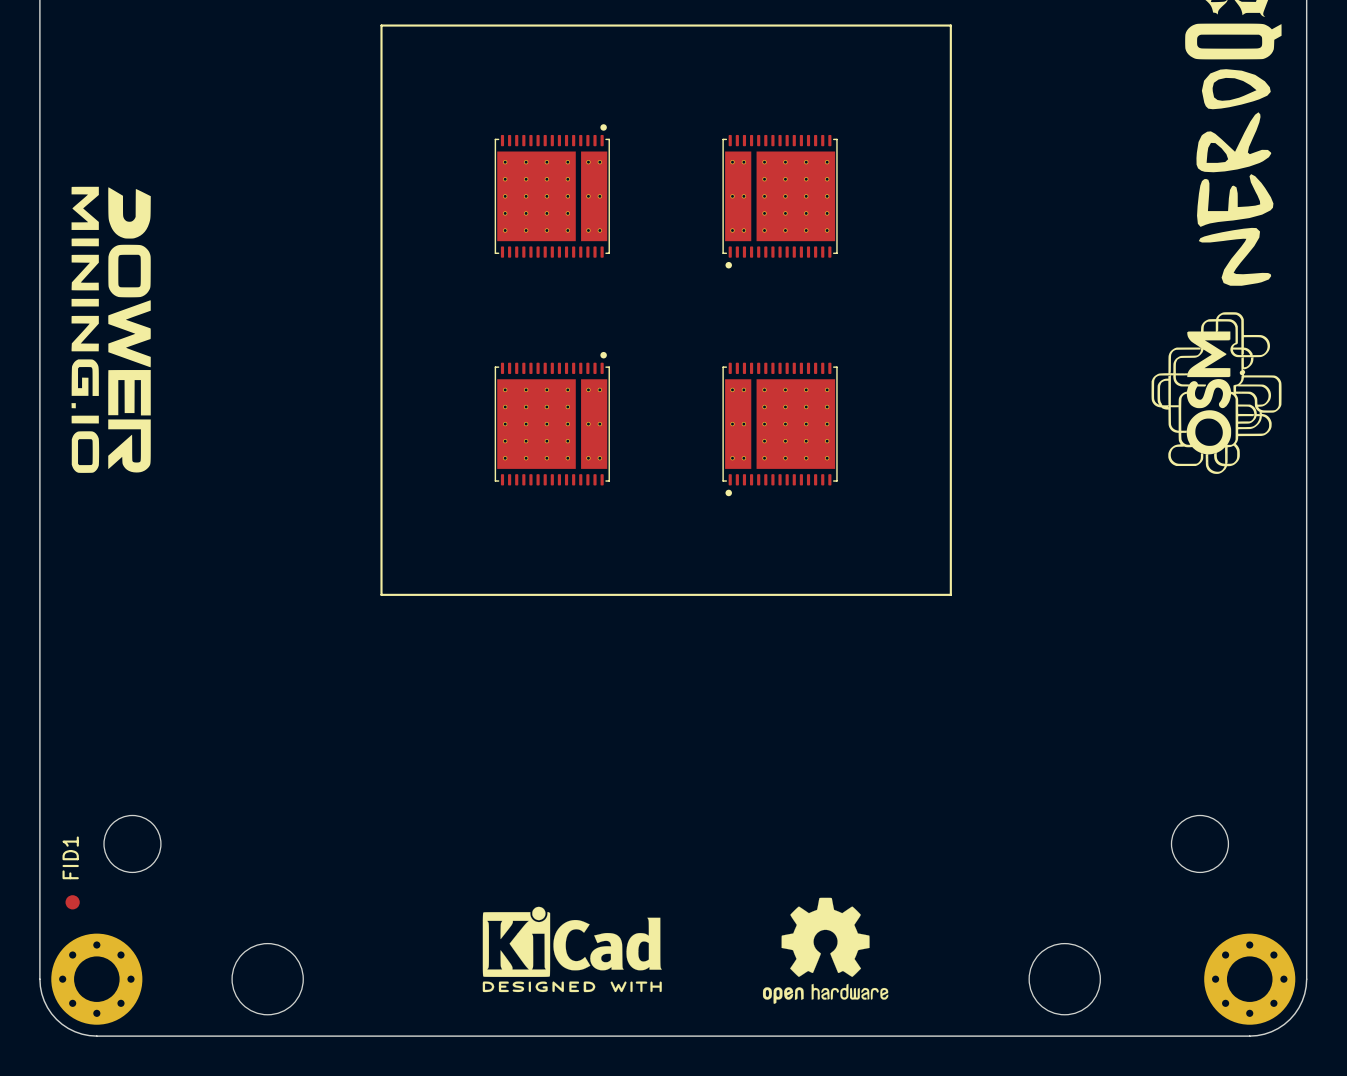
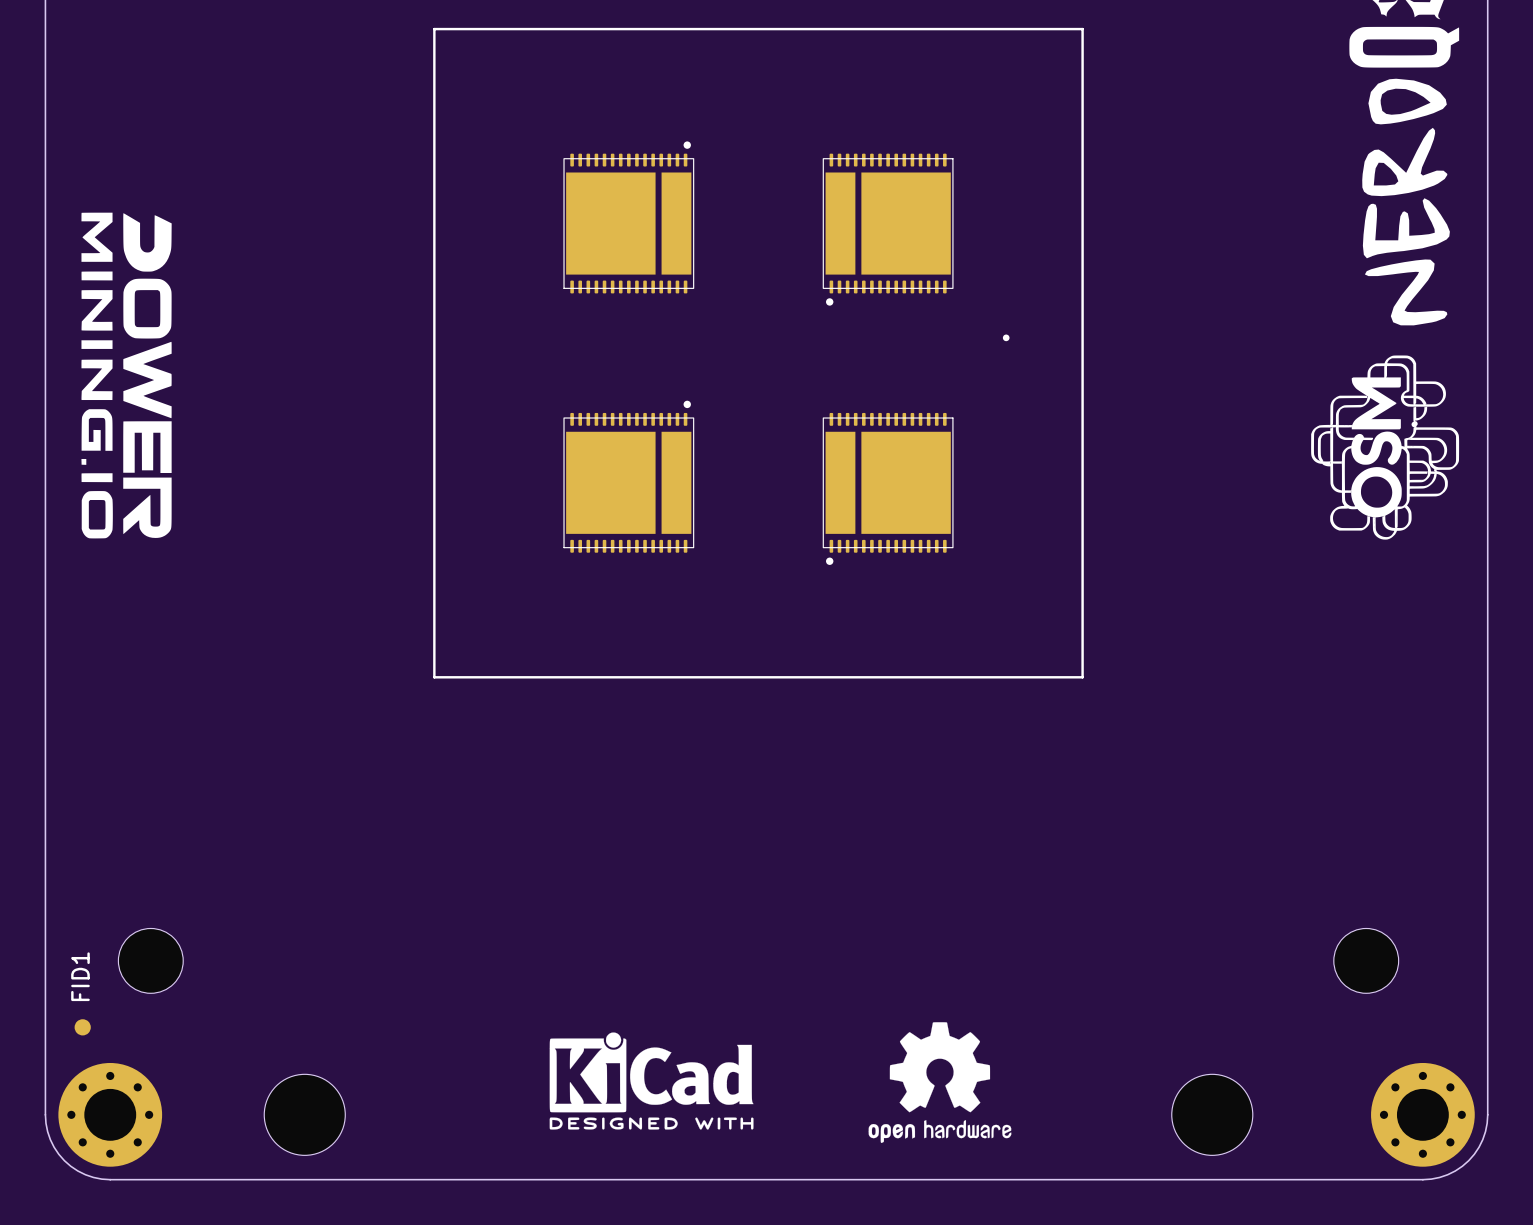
part footprint: [494, 124, 610, 258] -> [563, 141, 695, 294]
part footprint: [722, 134, 838, 269] -> [822, 153, 954, 306]
drawing: none -> [1002, 334, 1010, 342]
part footprint: [494, 351, 610, 486] -> [563, 400, 695, 553]
part footprint: [722, 362, 838, 497] -> [822, 412, 954, 565]

